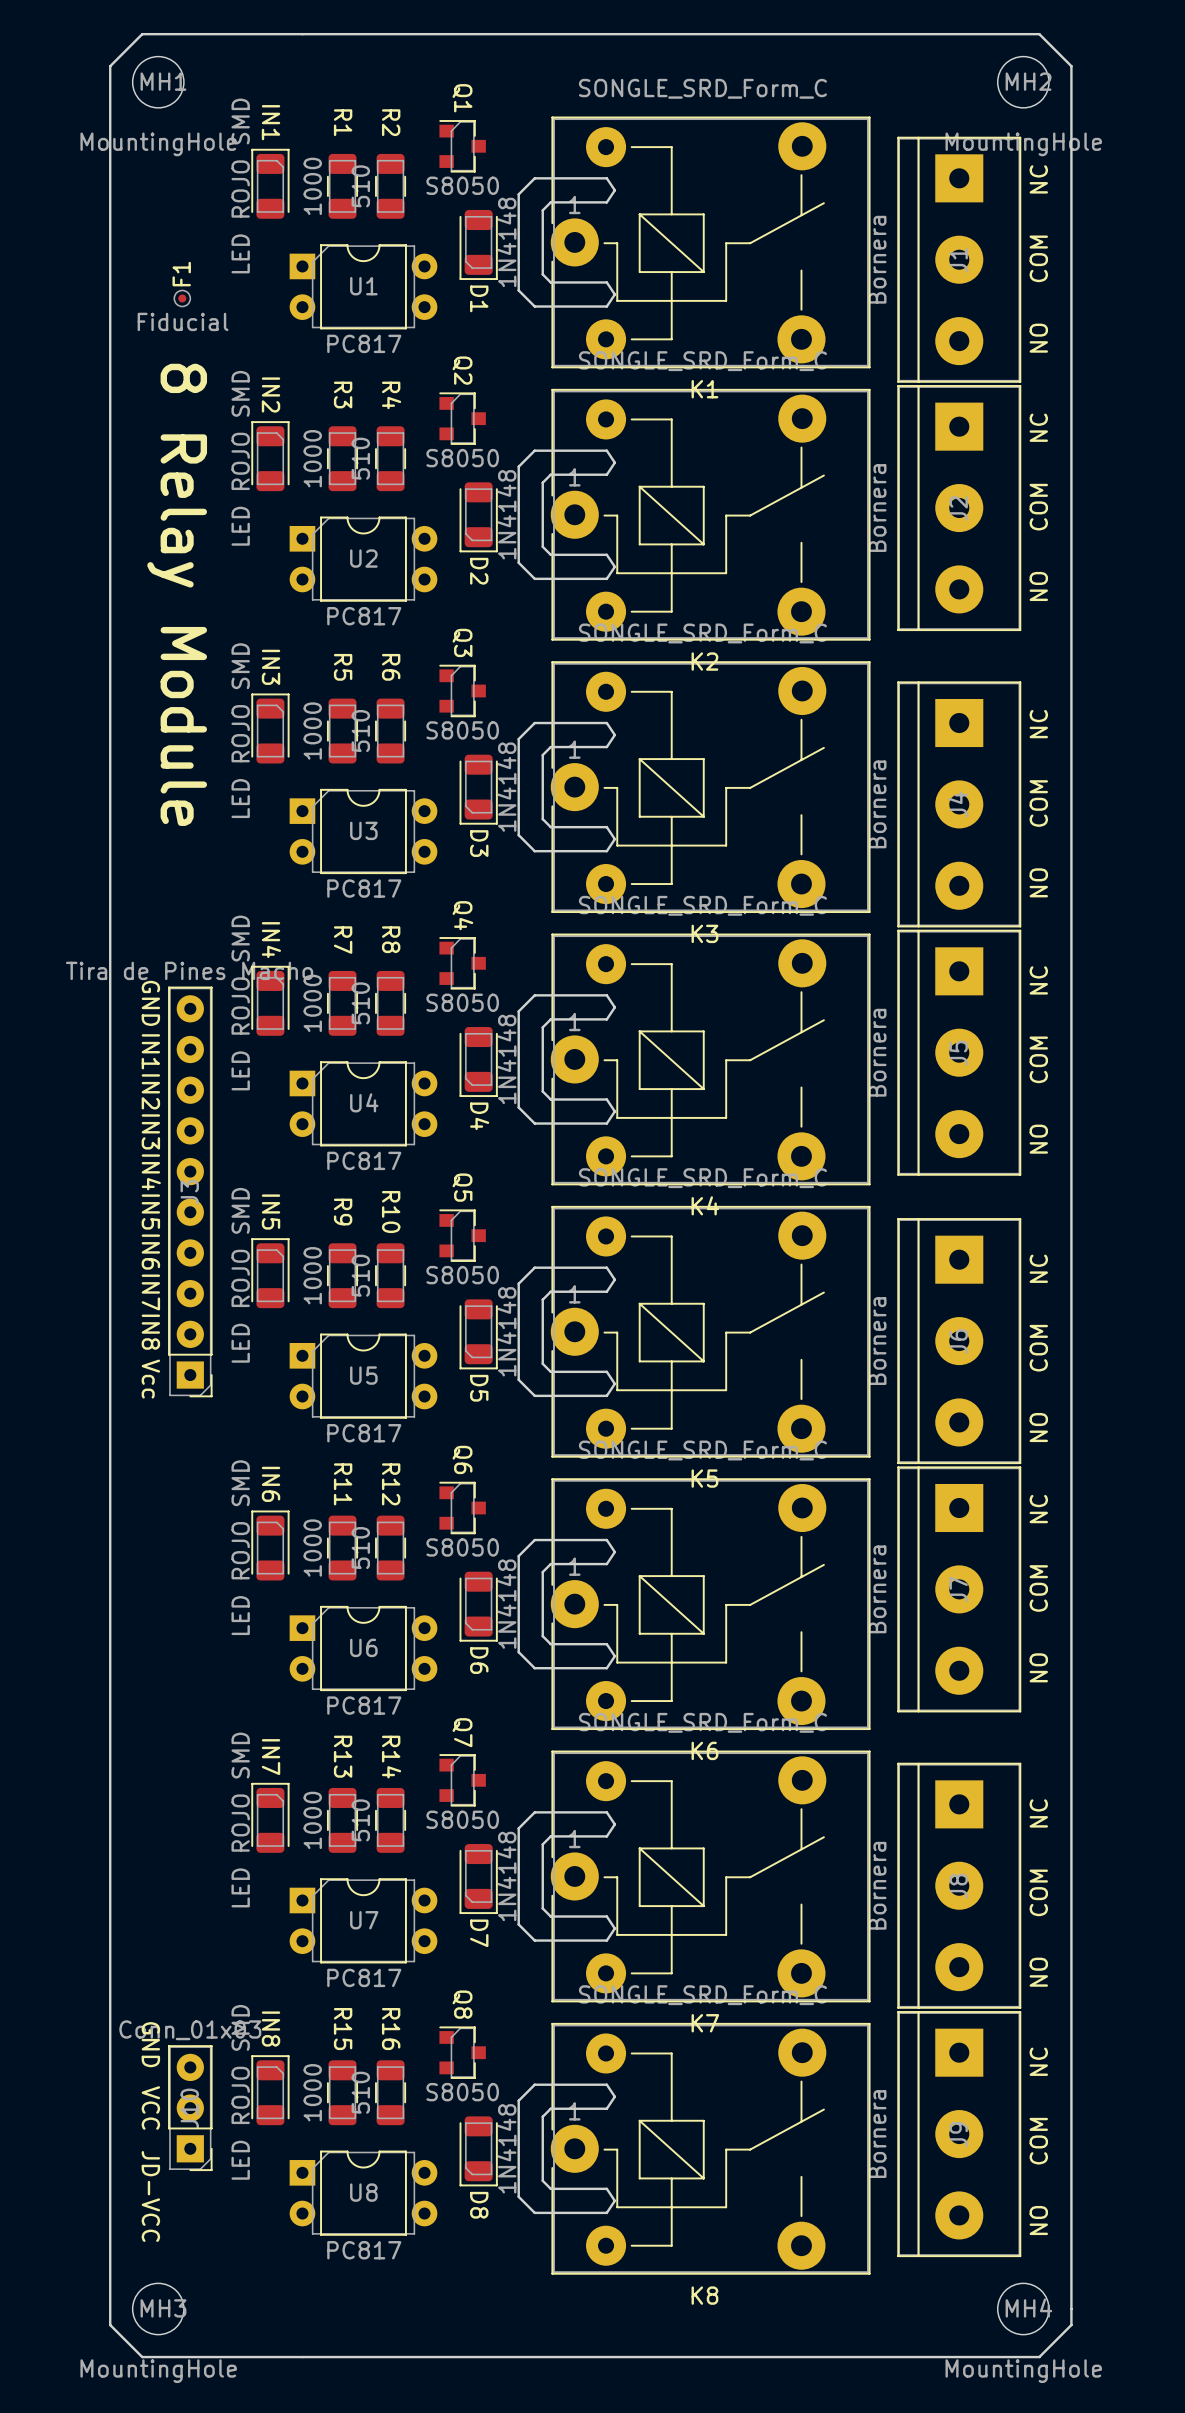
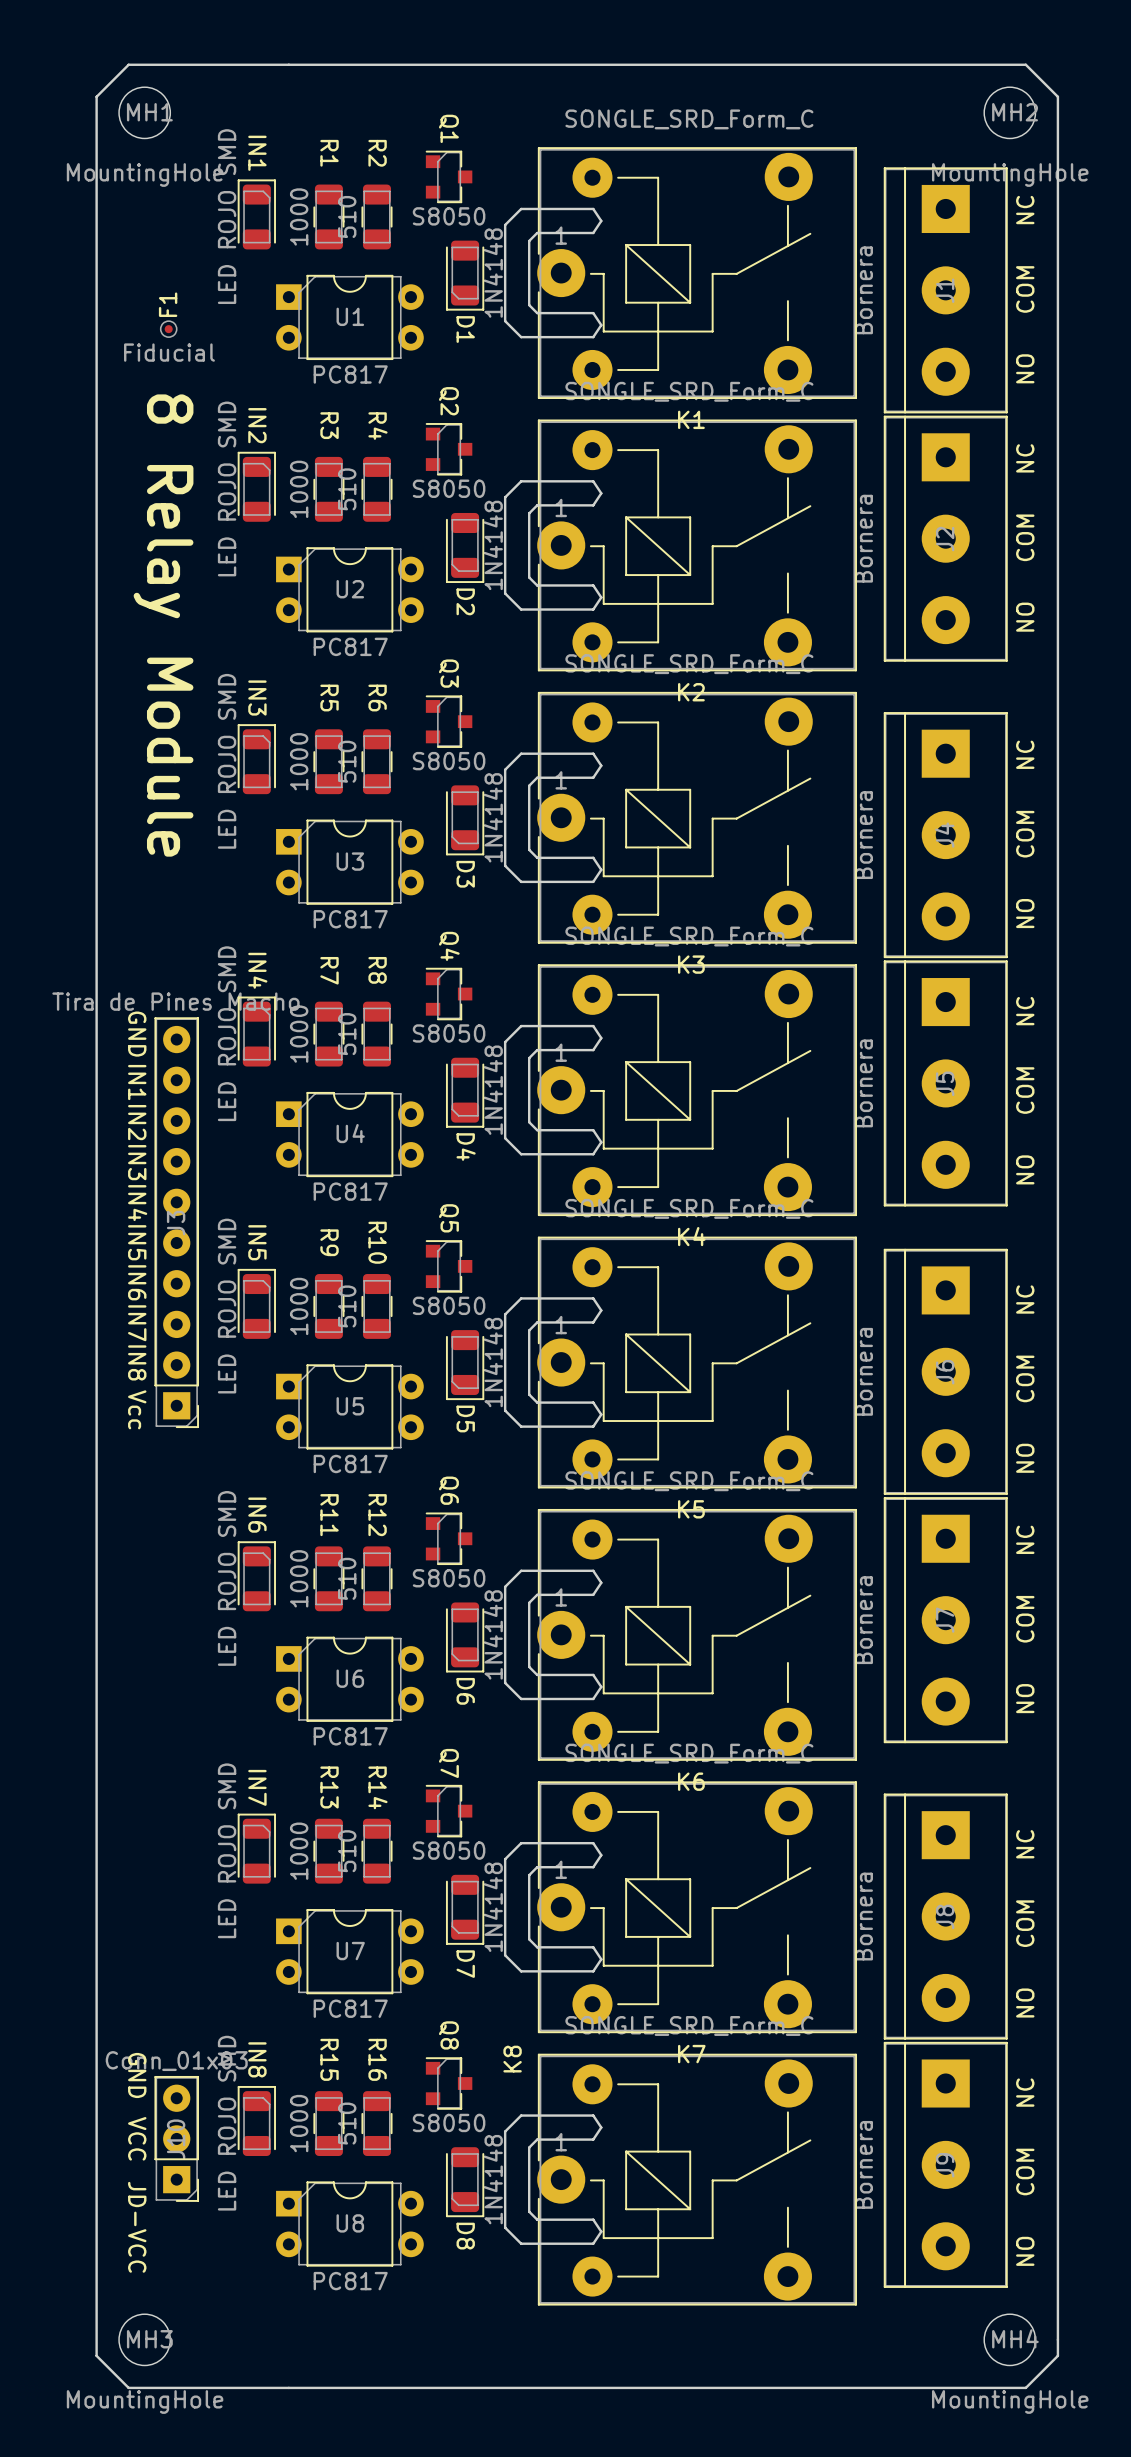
K8 name rotation: 0° (704, 2295) -> 90° counterclockwise (512, 2059)
K8 name position: K8 (704, 2295) -> K8 (512, 2059)

